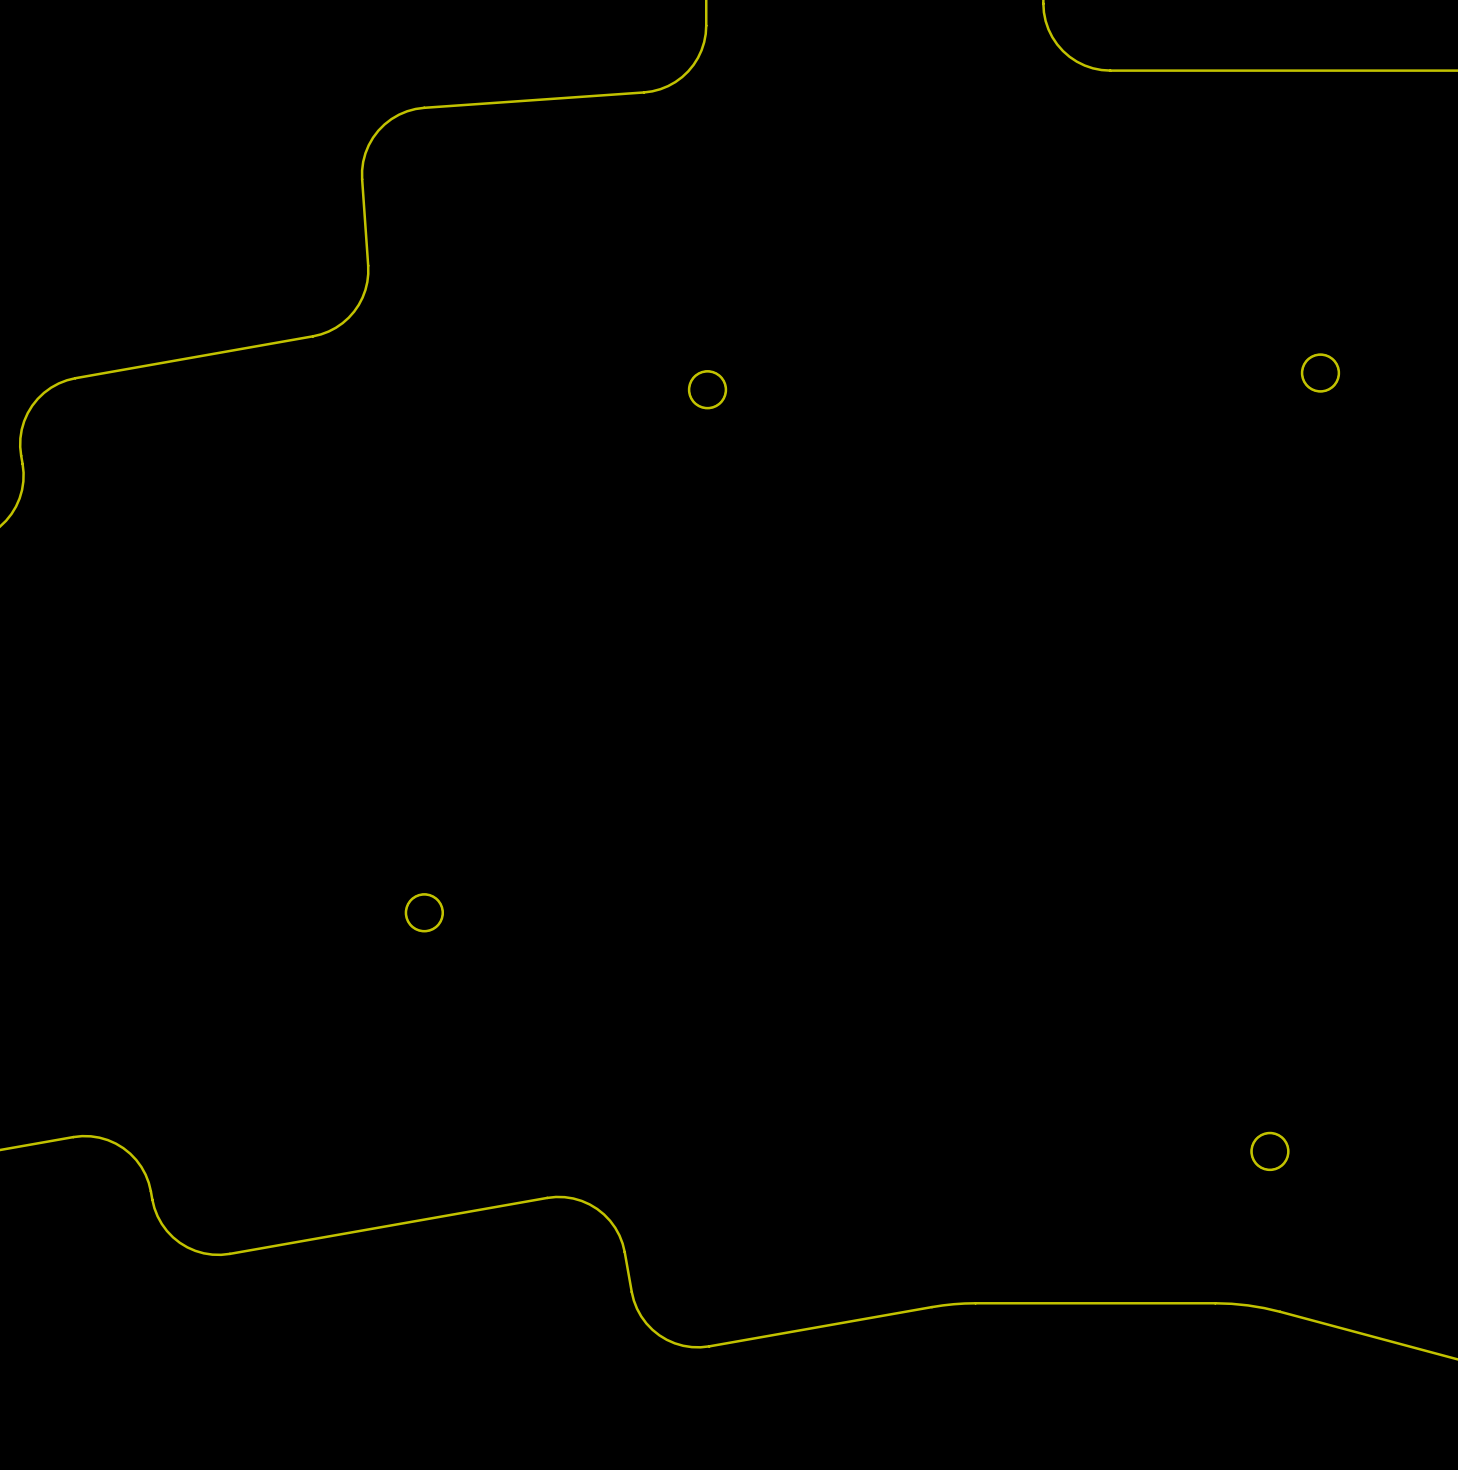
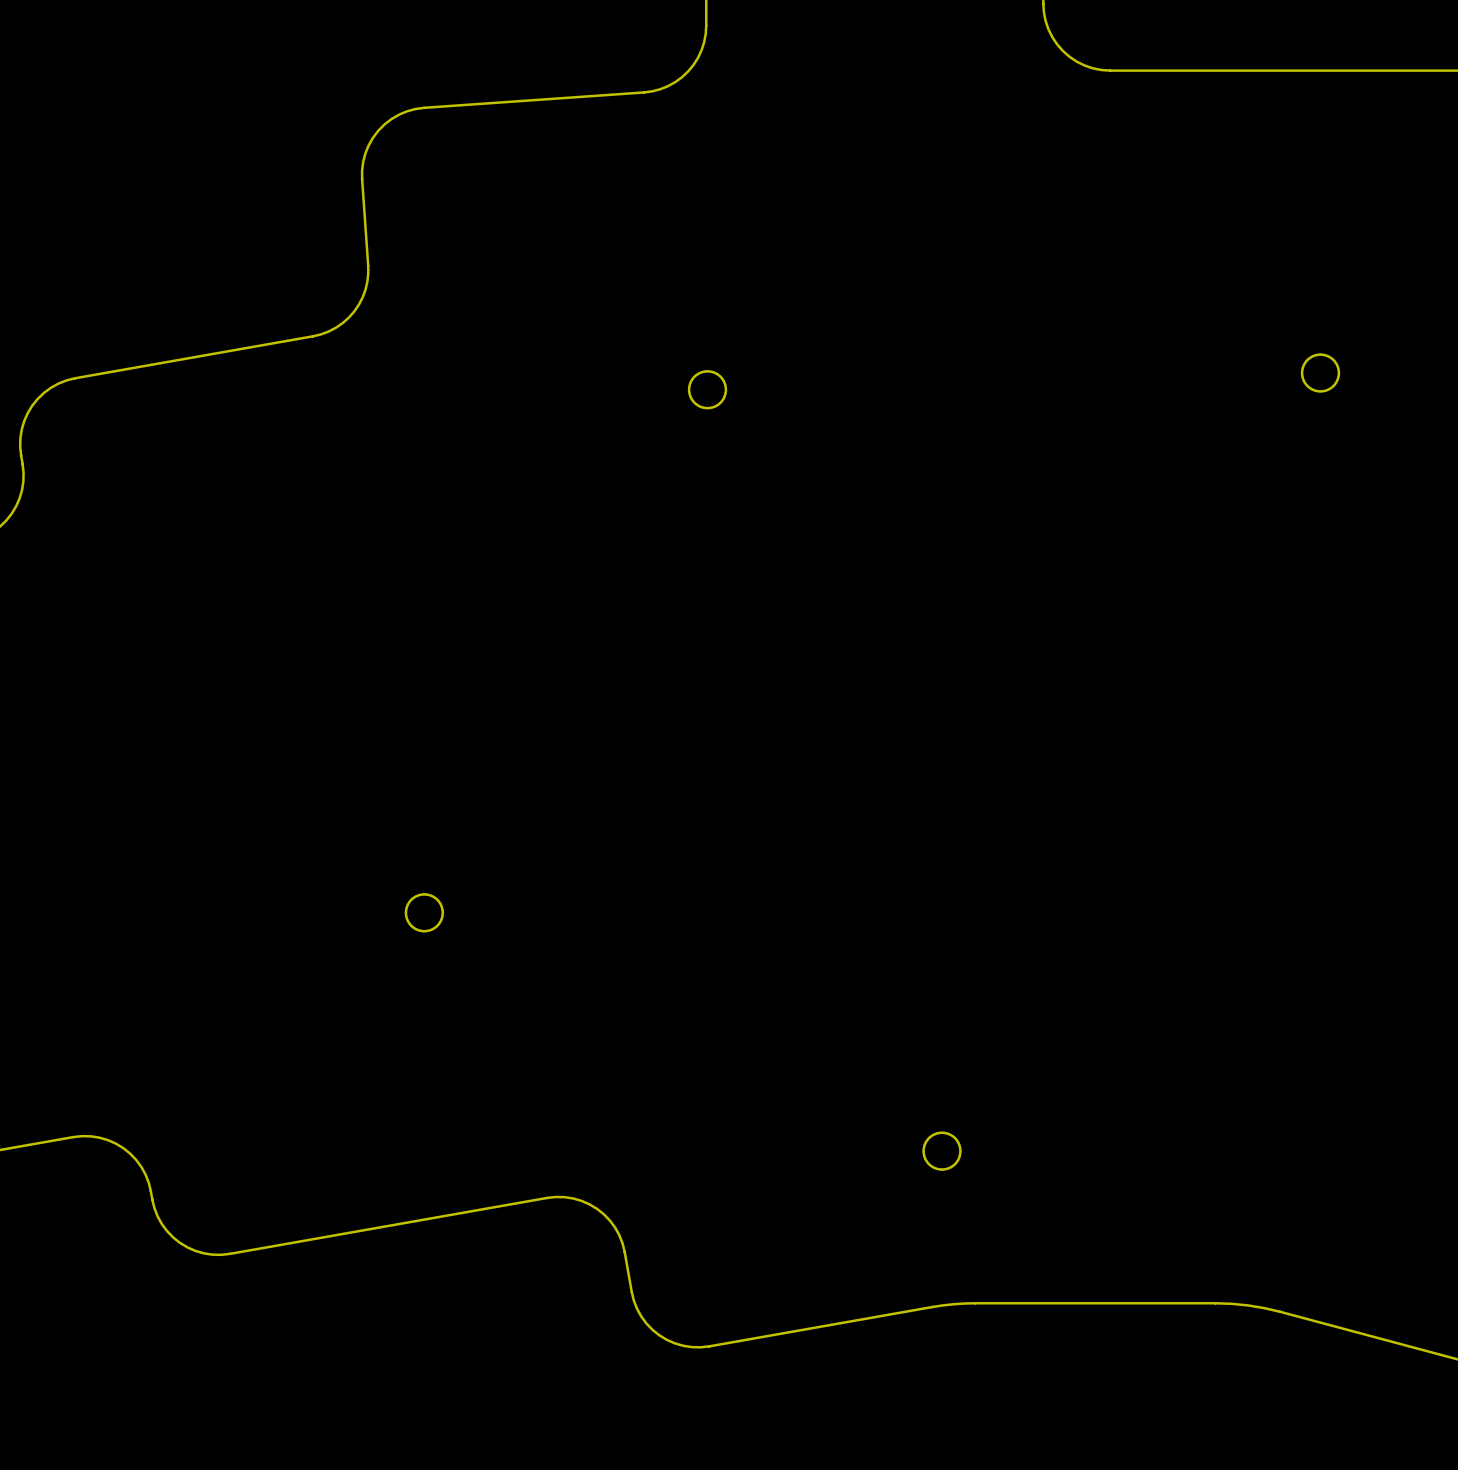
round board edge position: (1269, 1151) -> (942, 1151)

